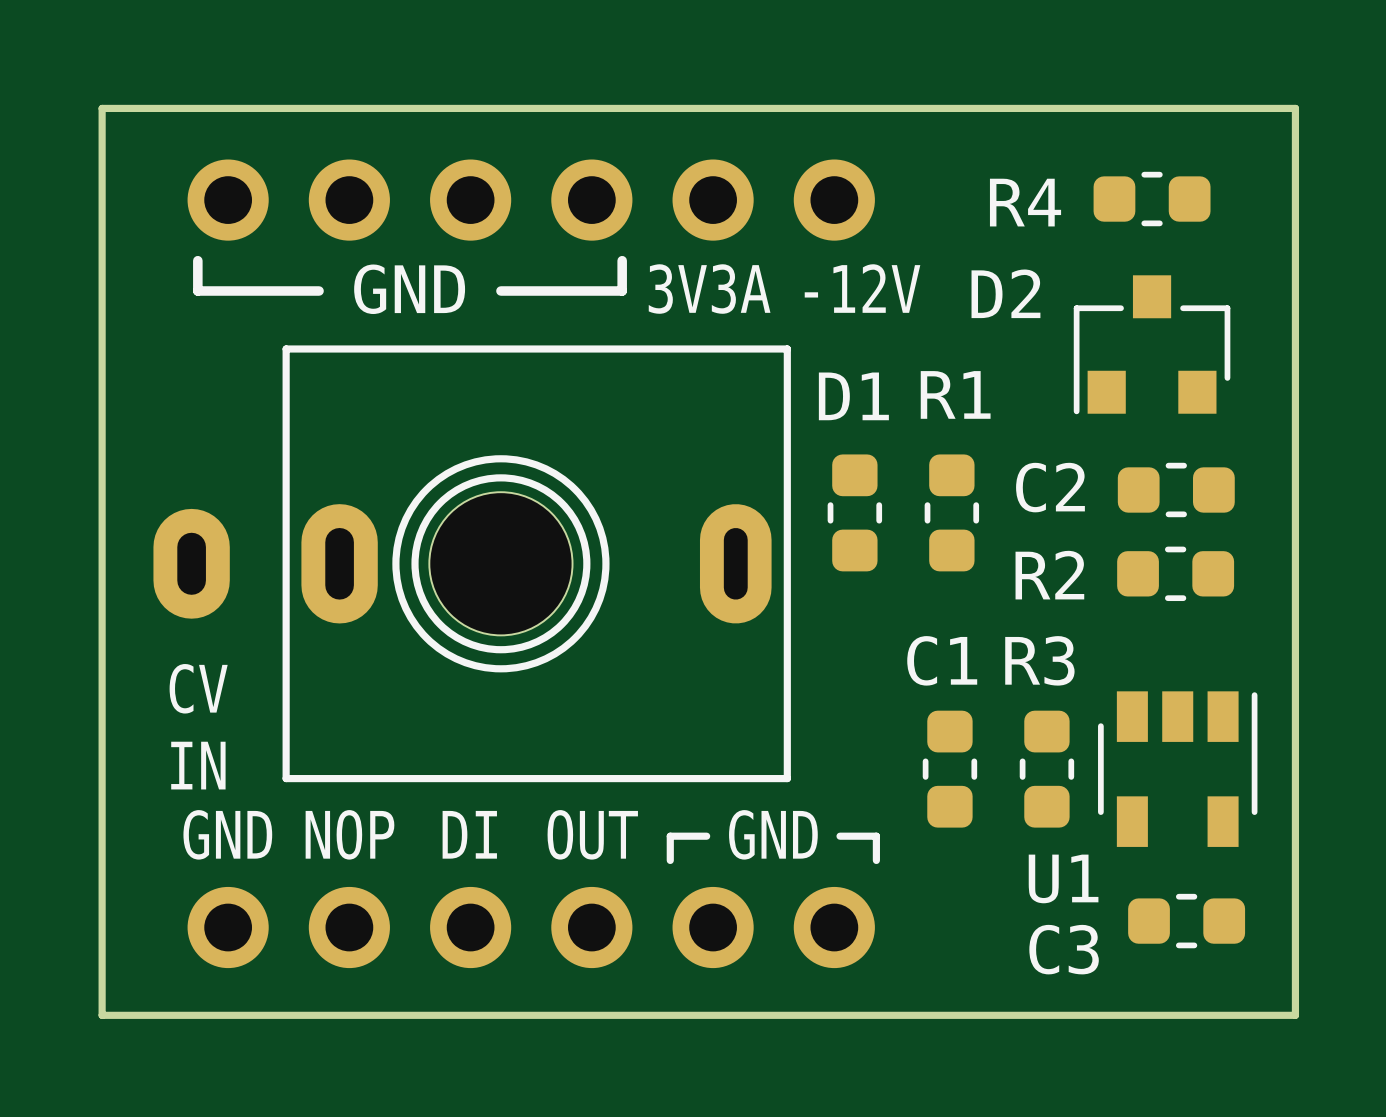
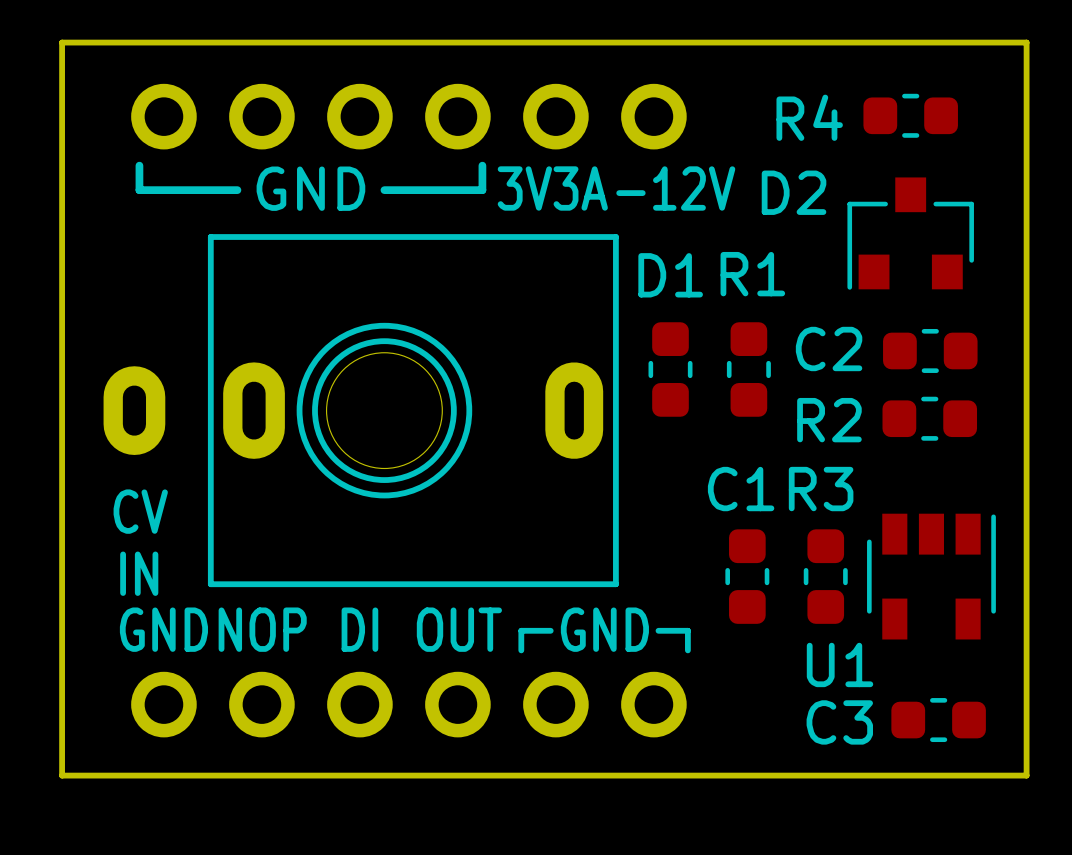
C3 position: (1186, 921) -> (938, 720)

